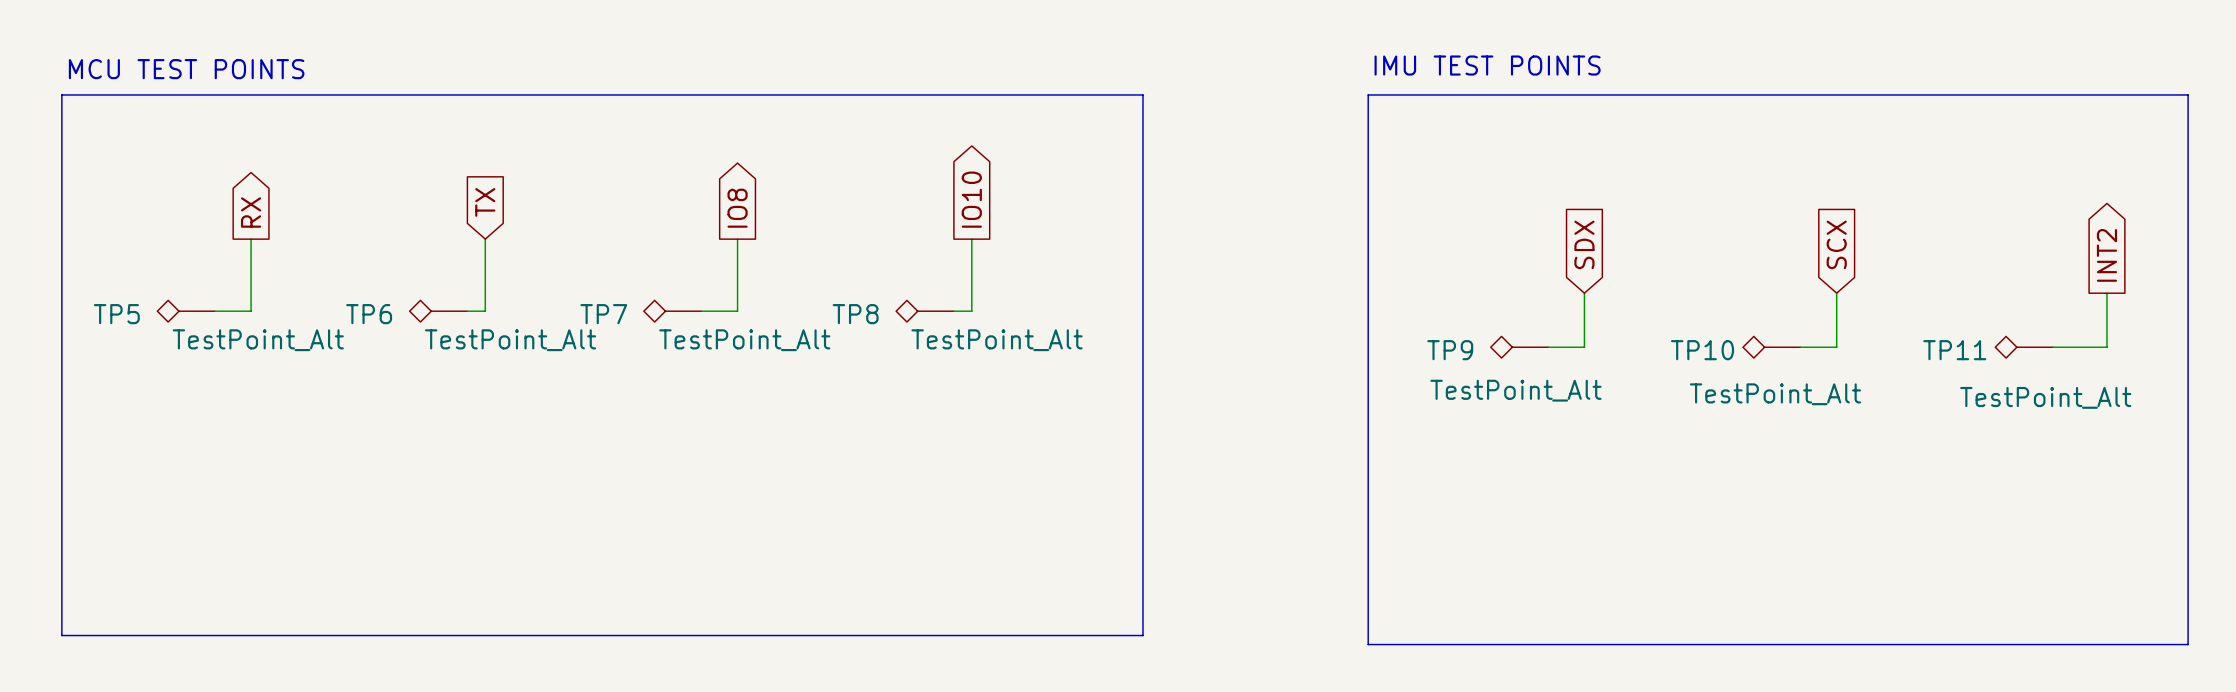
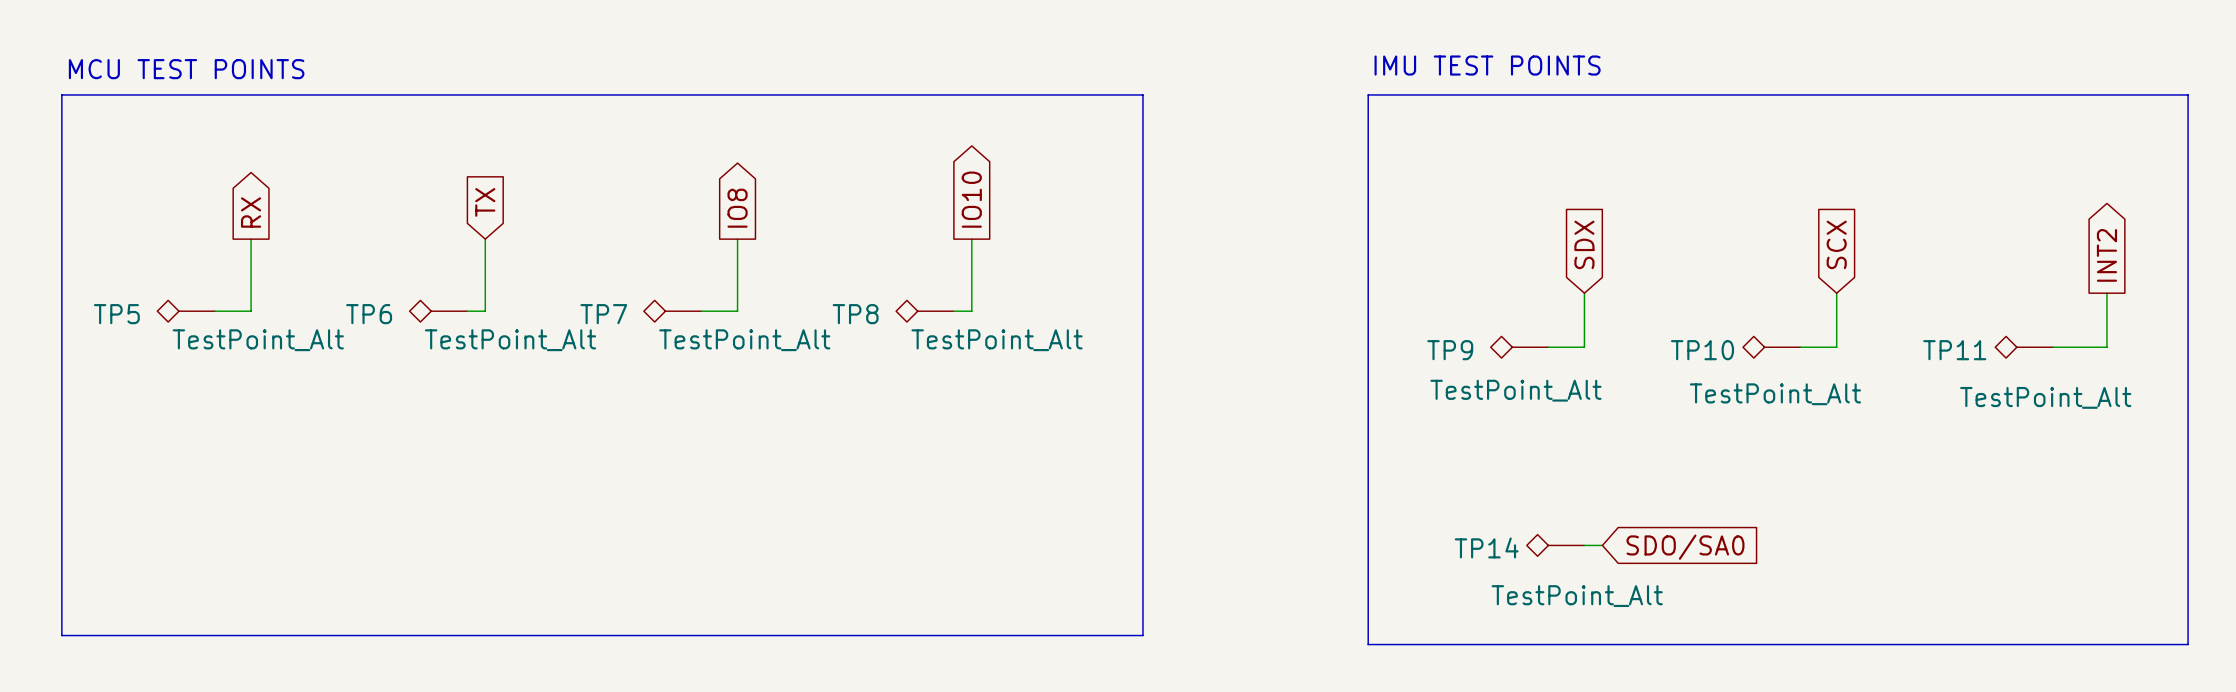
TP14: none -> TestPoint_Alt (1555, 545)
wire: none -> (1584, 545) (1602, 545)
global label: none -> SDO/SA0 (1685, 547)

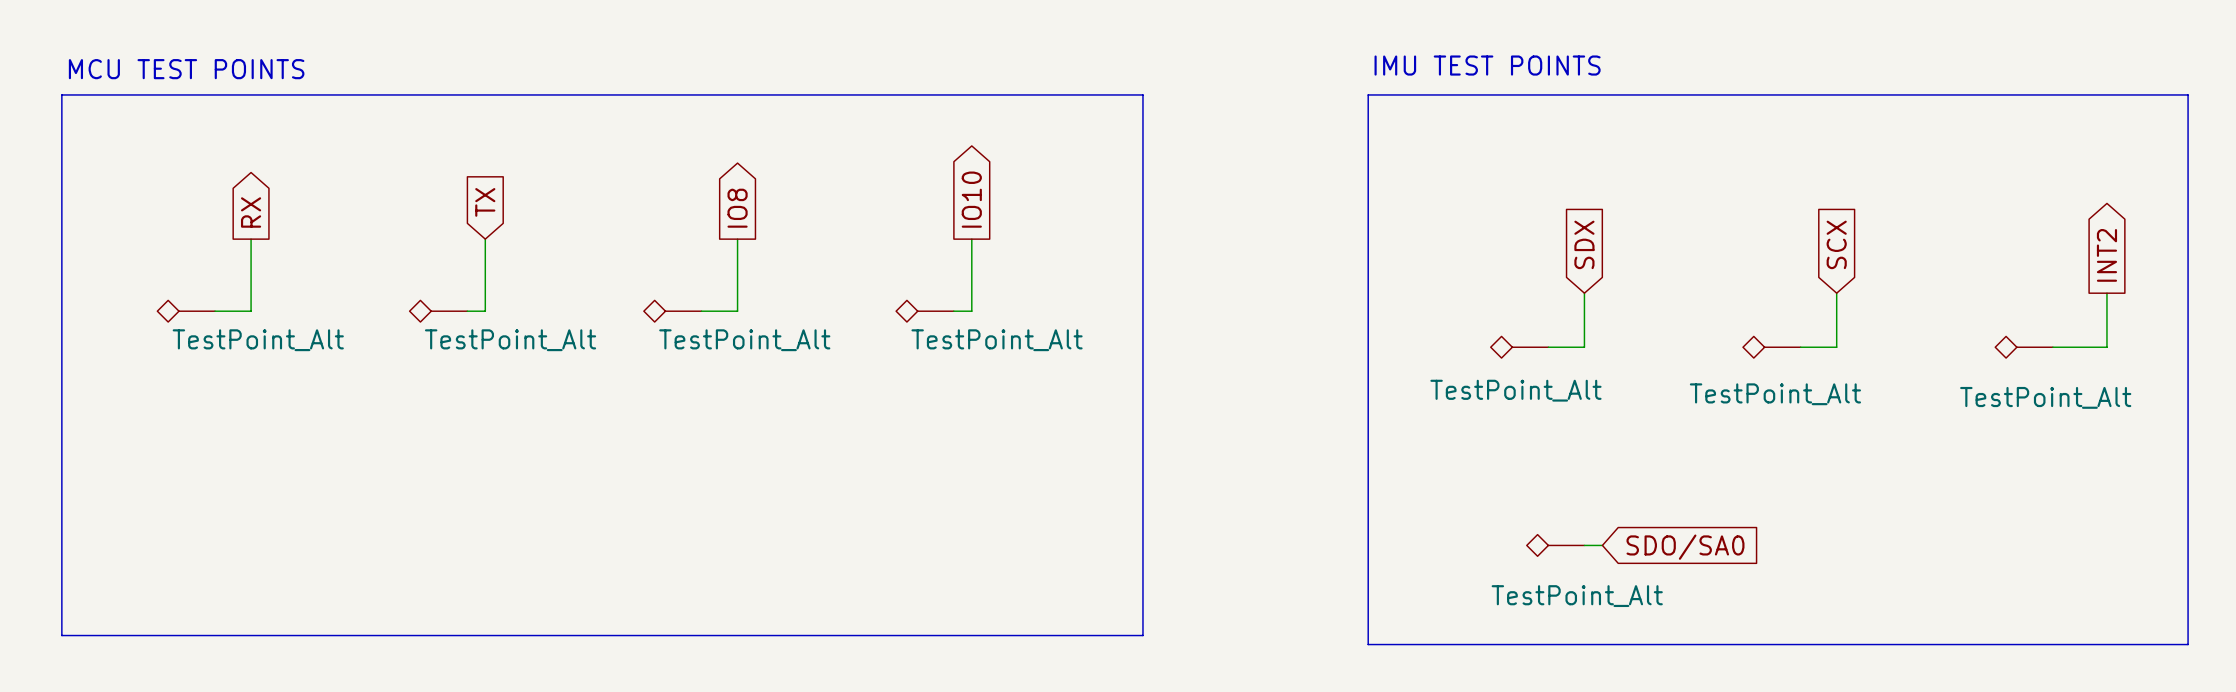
TP5 name: TP5 (116, 314) -> none
TP6 name: TP6 (369, 314) -> none
TP7 name: TP7 (603, 314) -> none
TP8 name: TP8 (855, 314) -> none
TP9 name: TP9 (1450, 350) -> none
TP10 name: TP10 (1702, 350) -> none
TP11 name: TP11 (1954, 350) -> none
TP14 name: TP14 (1486, 547) -> none

